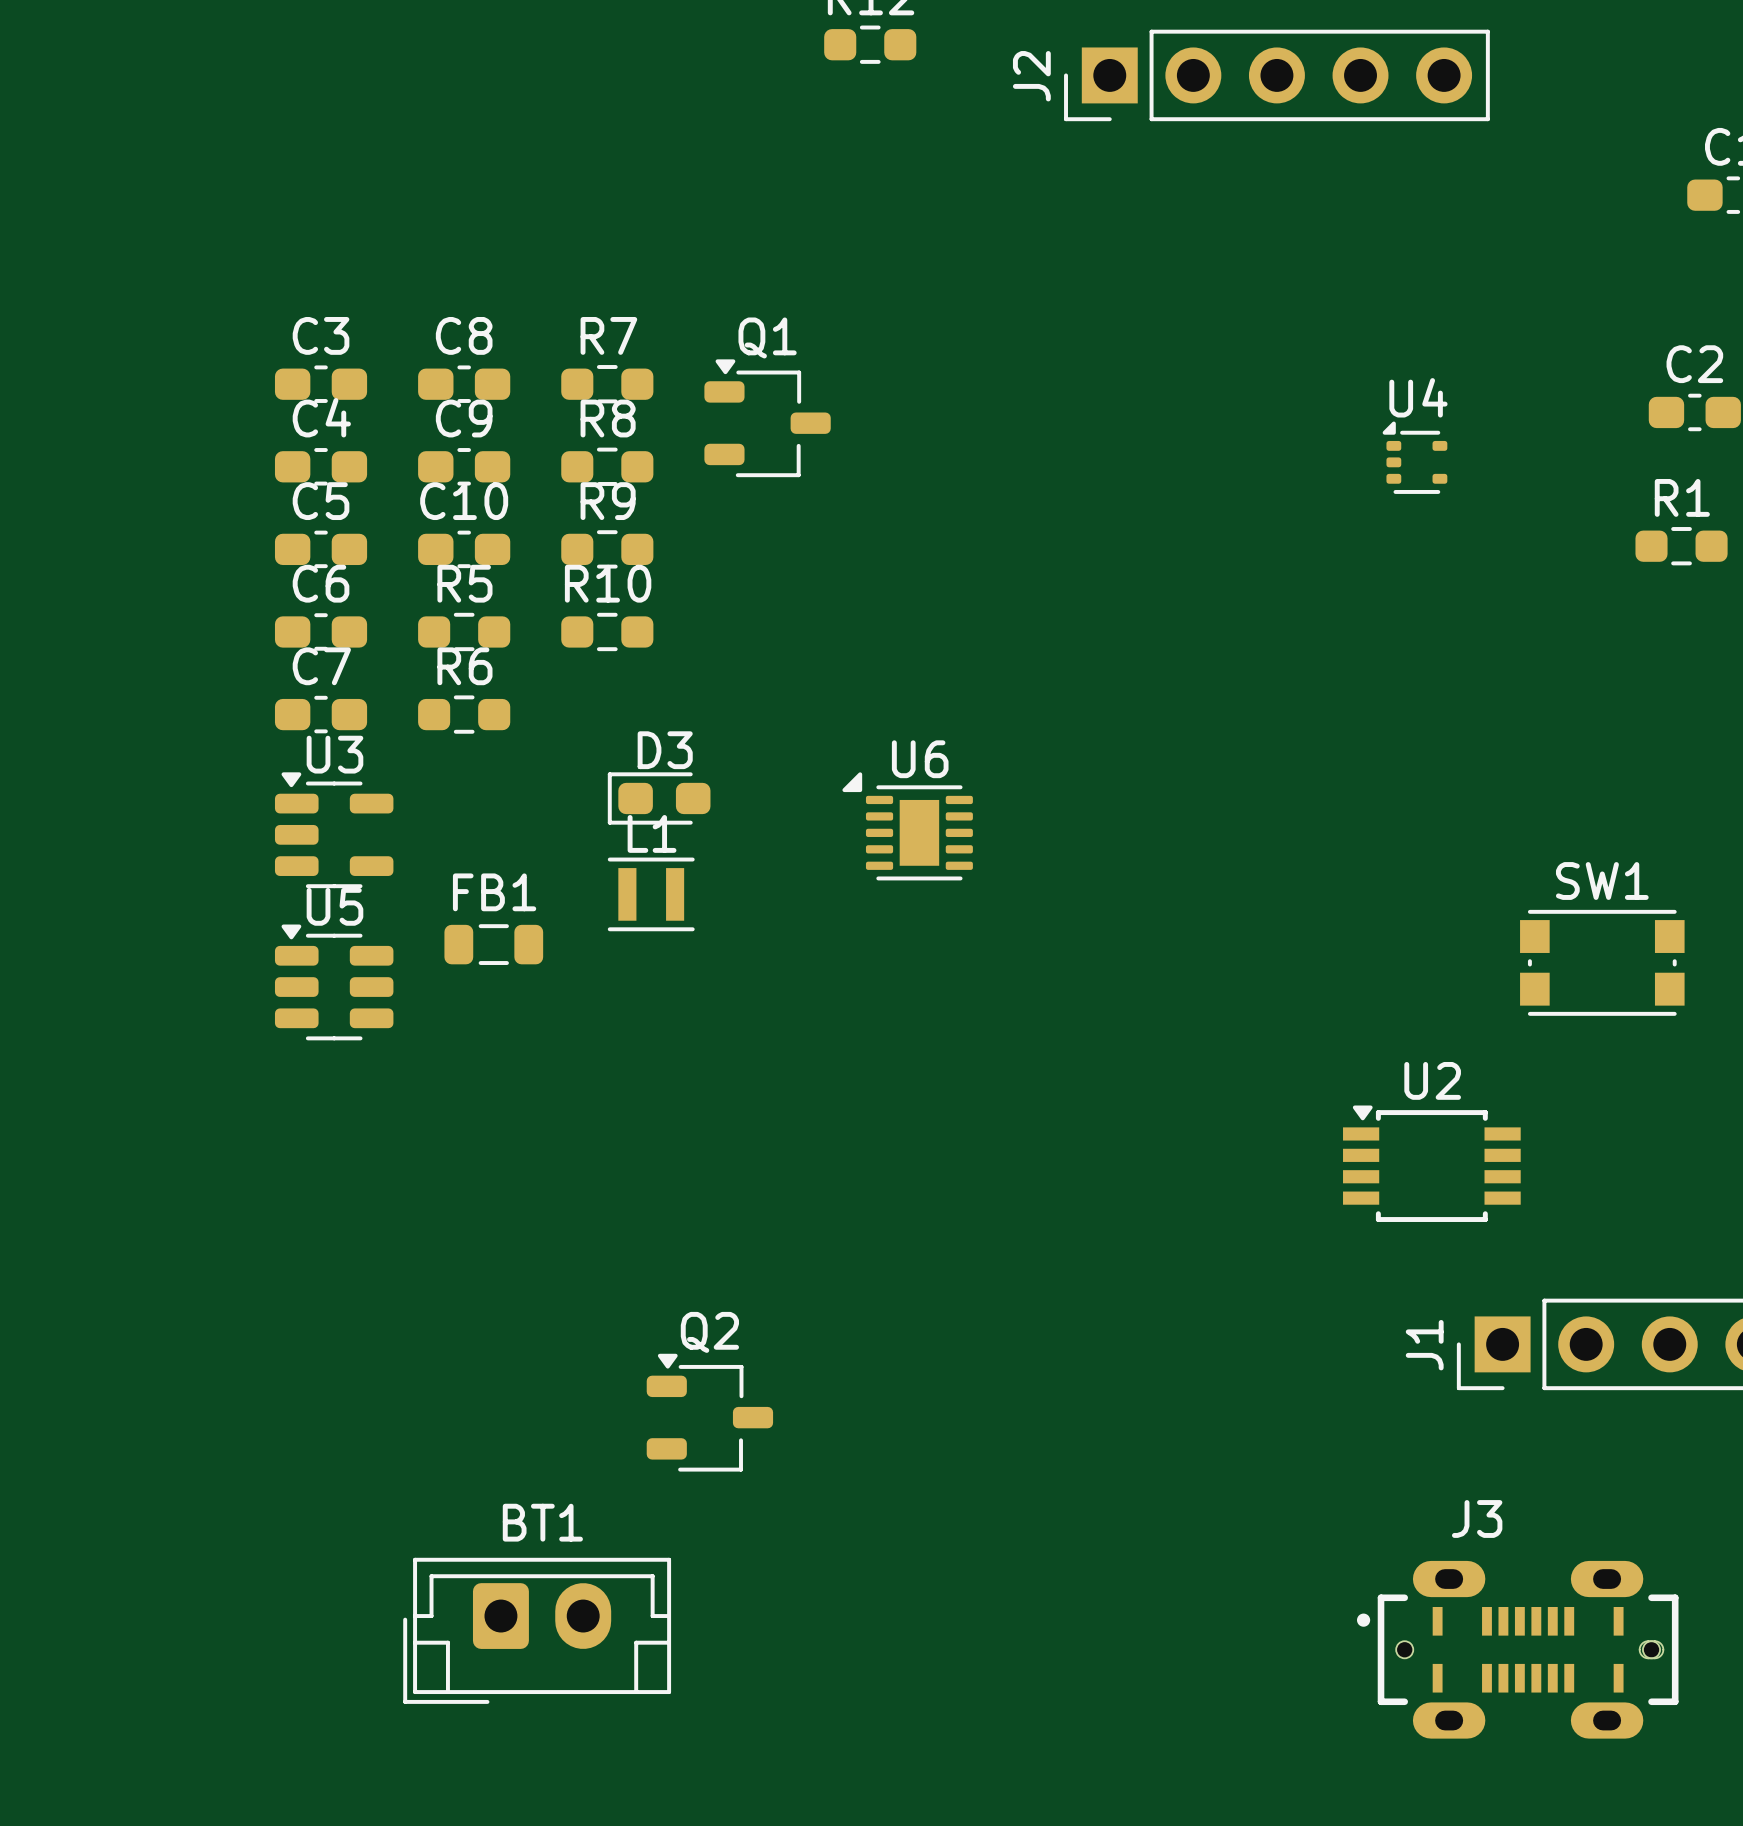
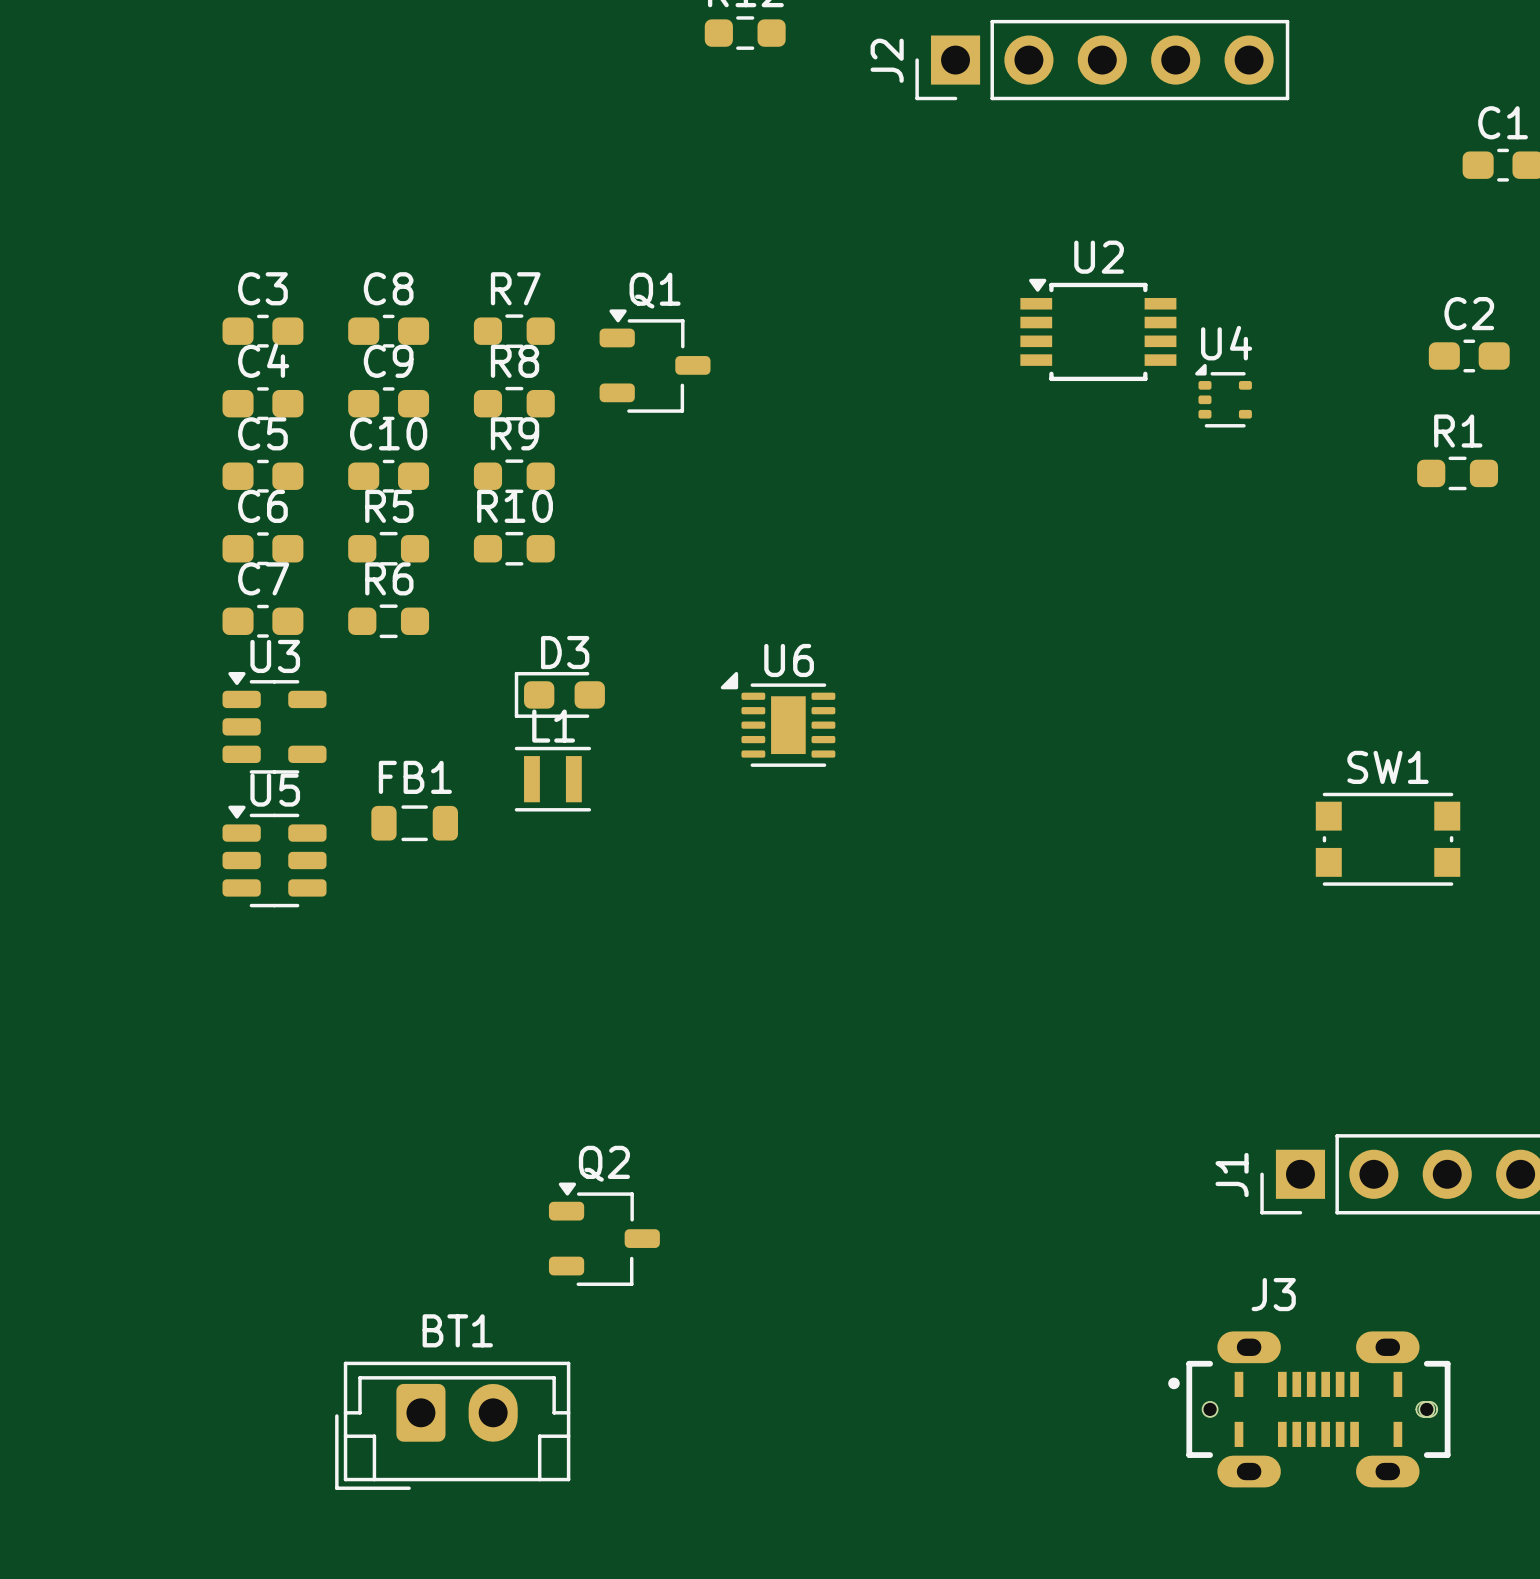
U2 position: (1431, 1163) -> (1098, 329)
J3 position: (1517, 1649) -> (1309, 1409)

